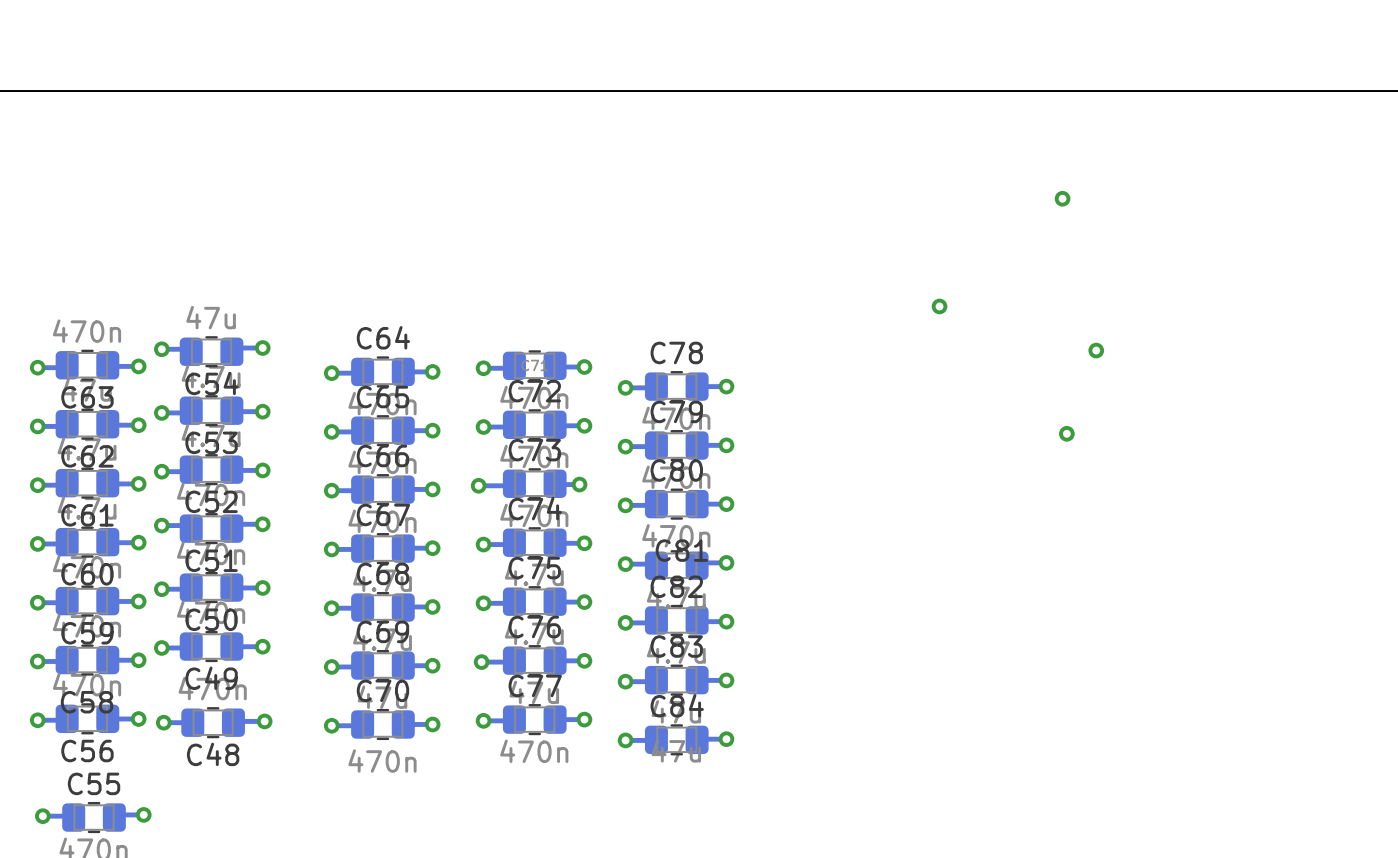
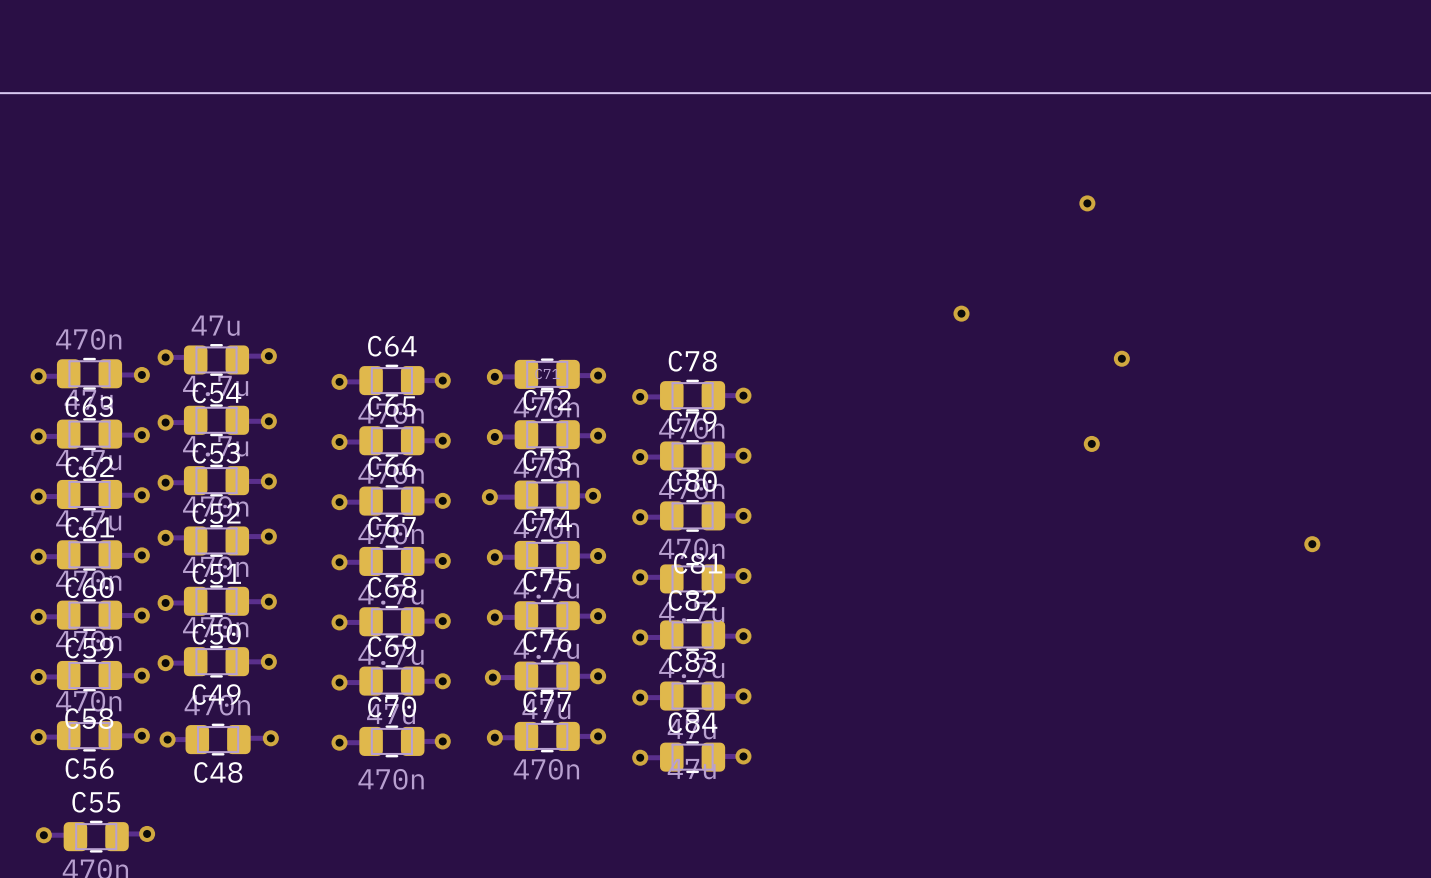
via: none -> (1312, 544)

